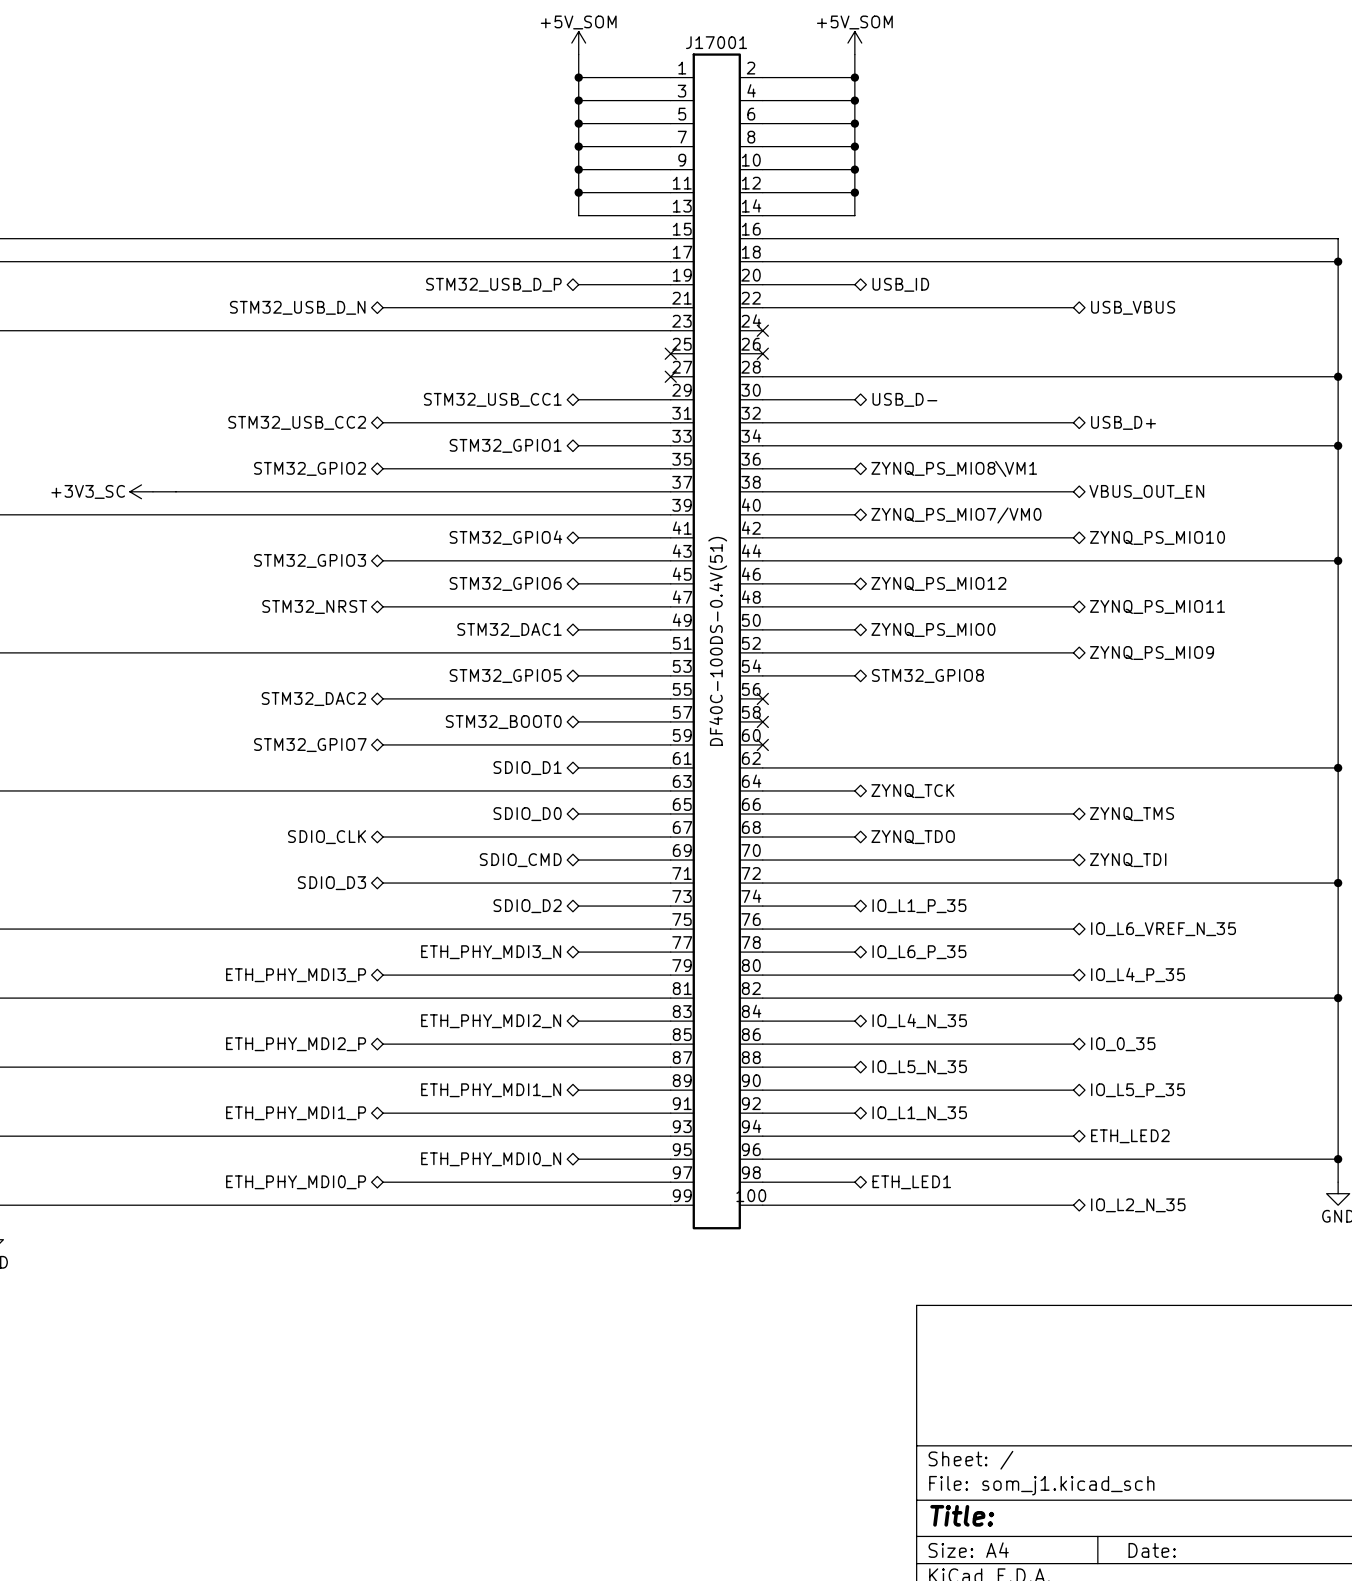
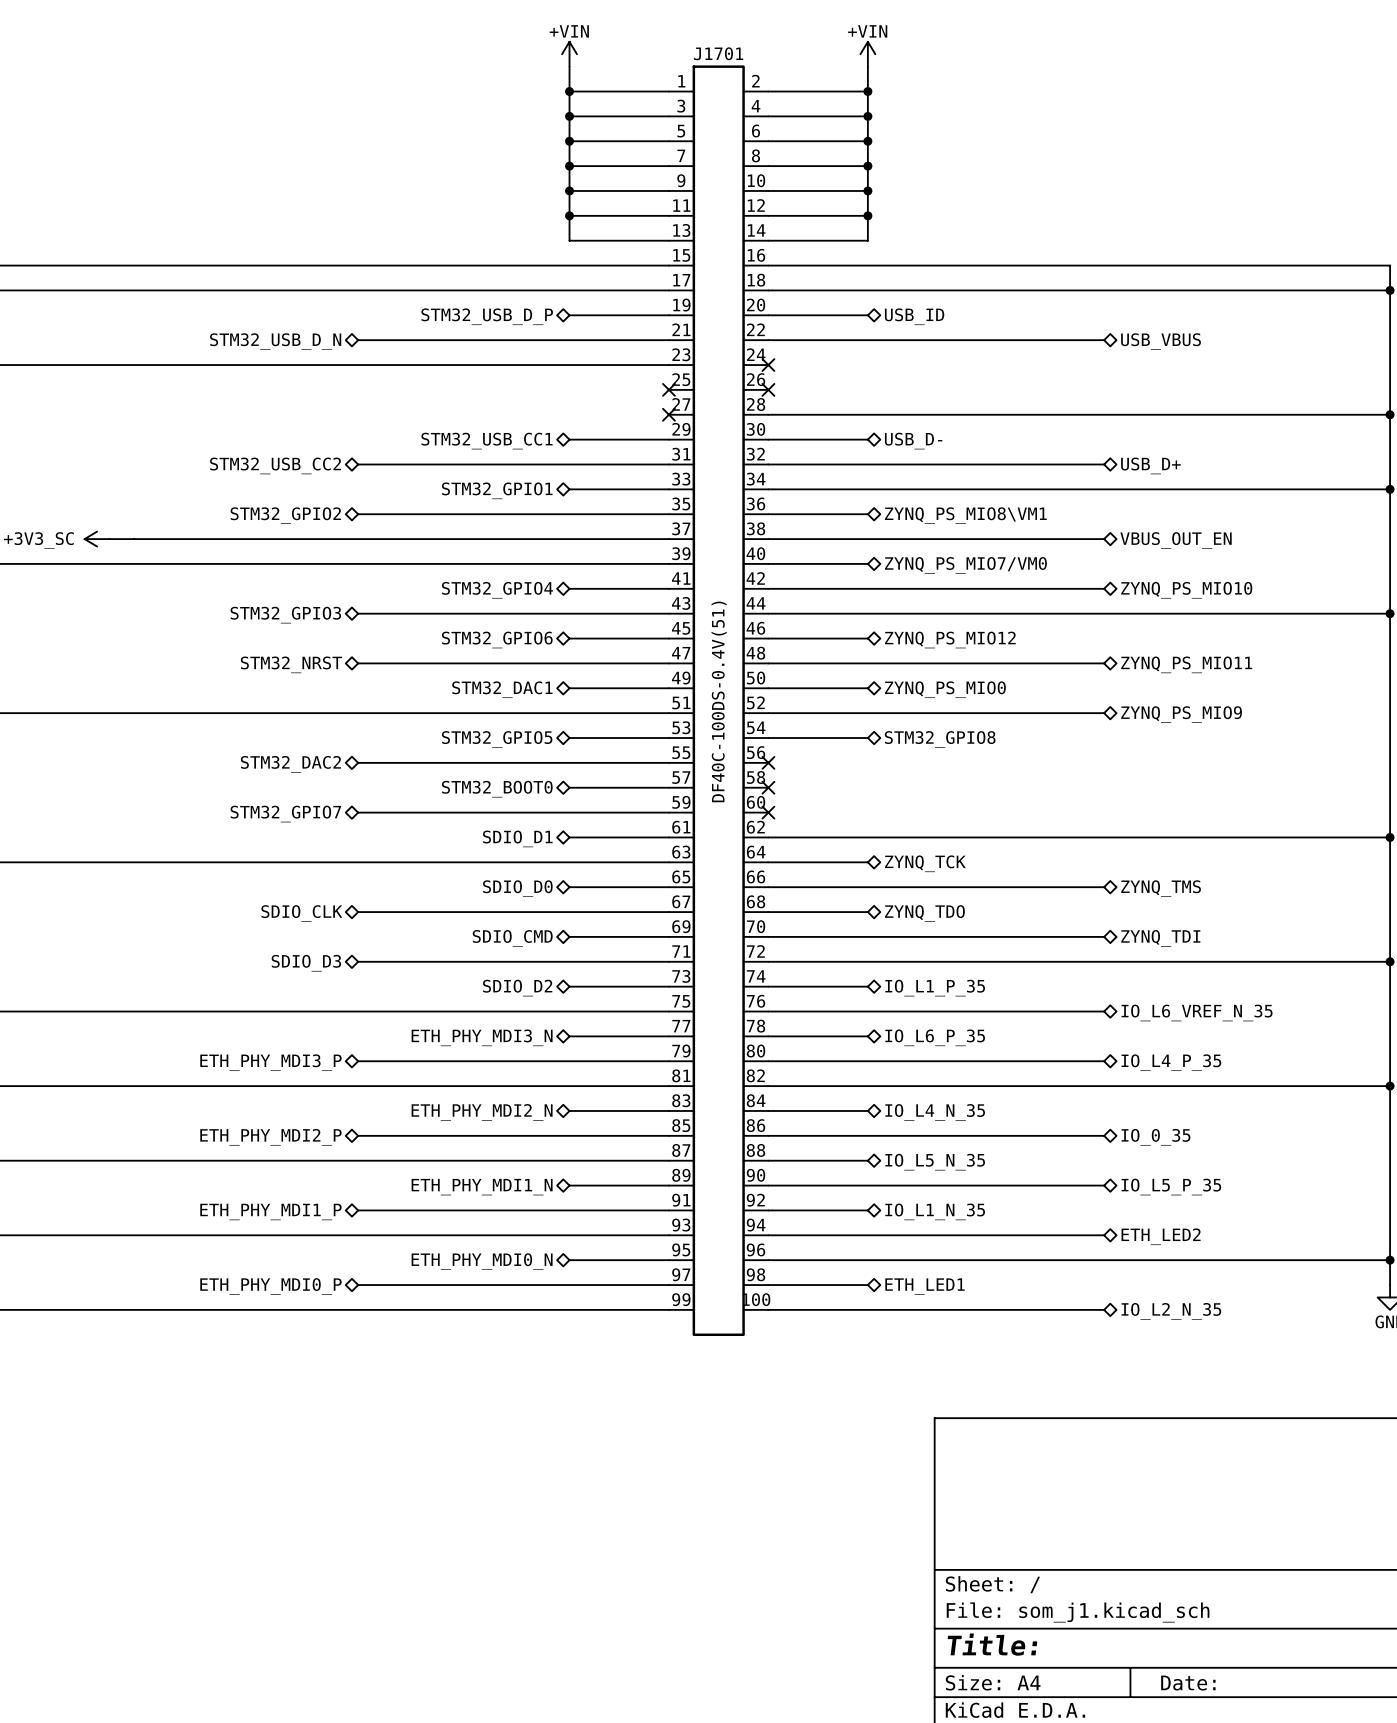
J17001 name: J17001 (716, 42) -> J1701 (718, 53)
power symbol: +5V_SOM (578, 43) -> +VIN (569, 54)
power symbol: +5V_SOM (854, 43) -> +VIN (867, 54)

